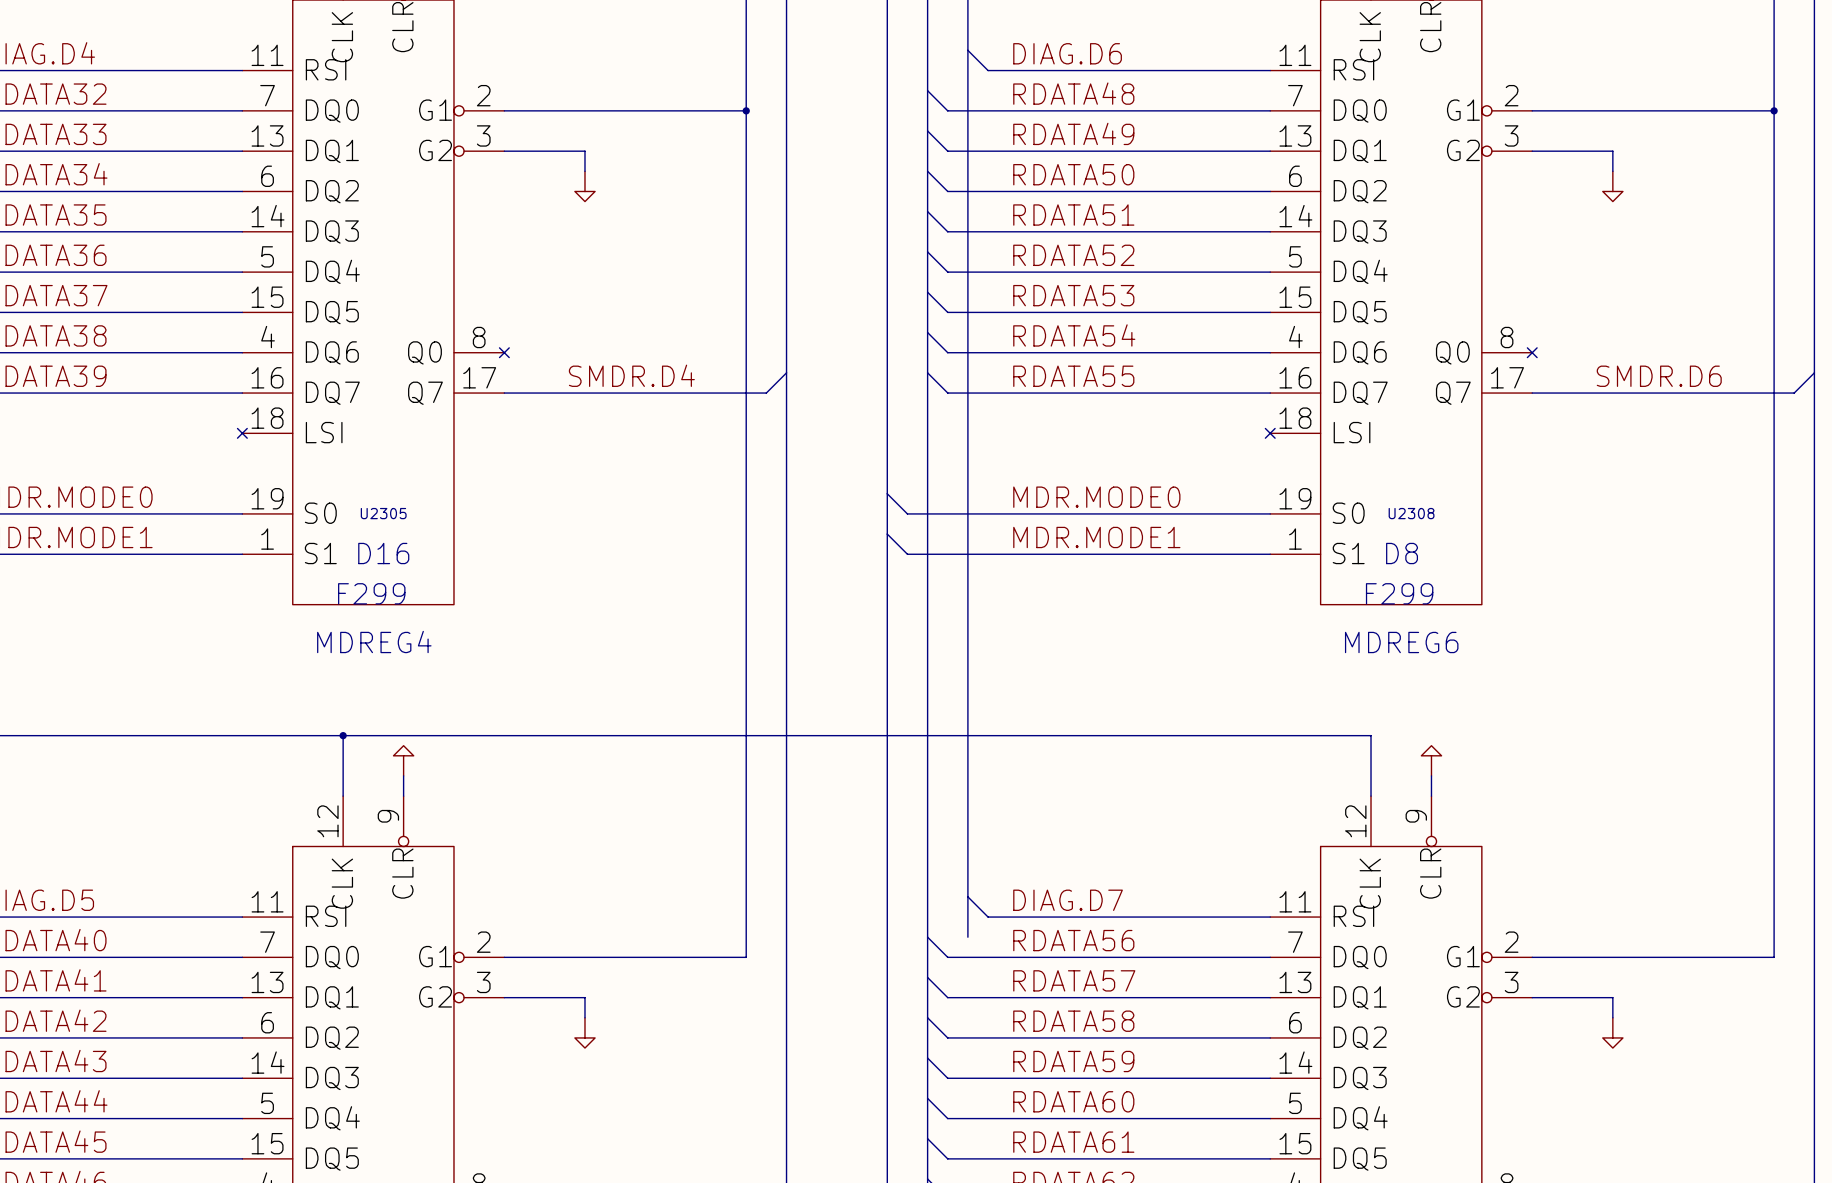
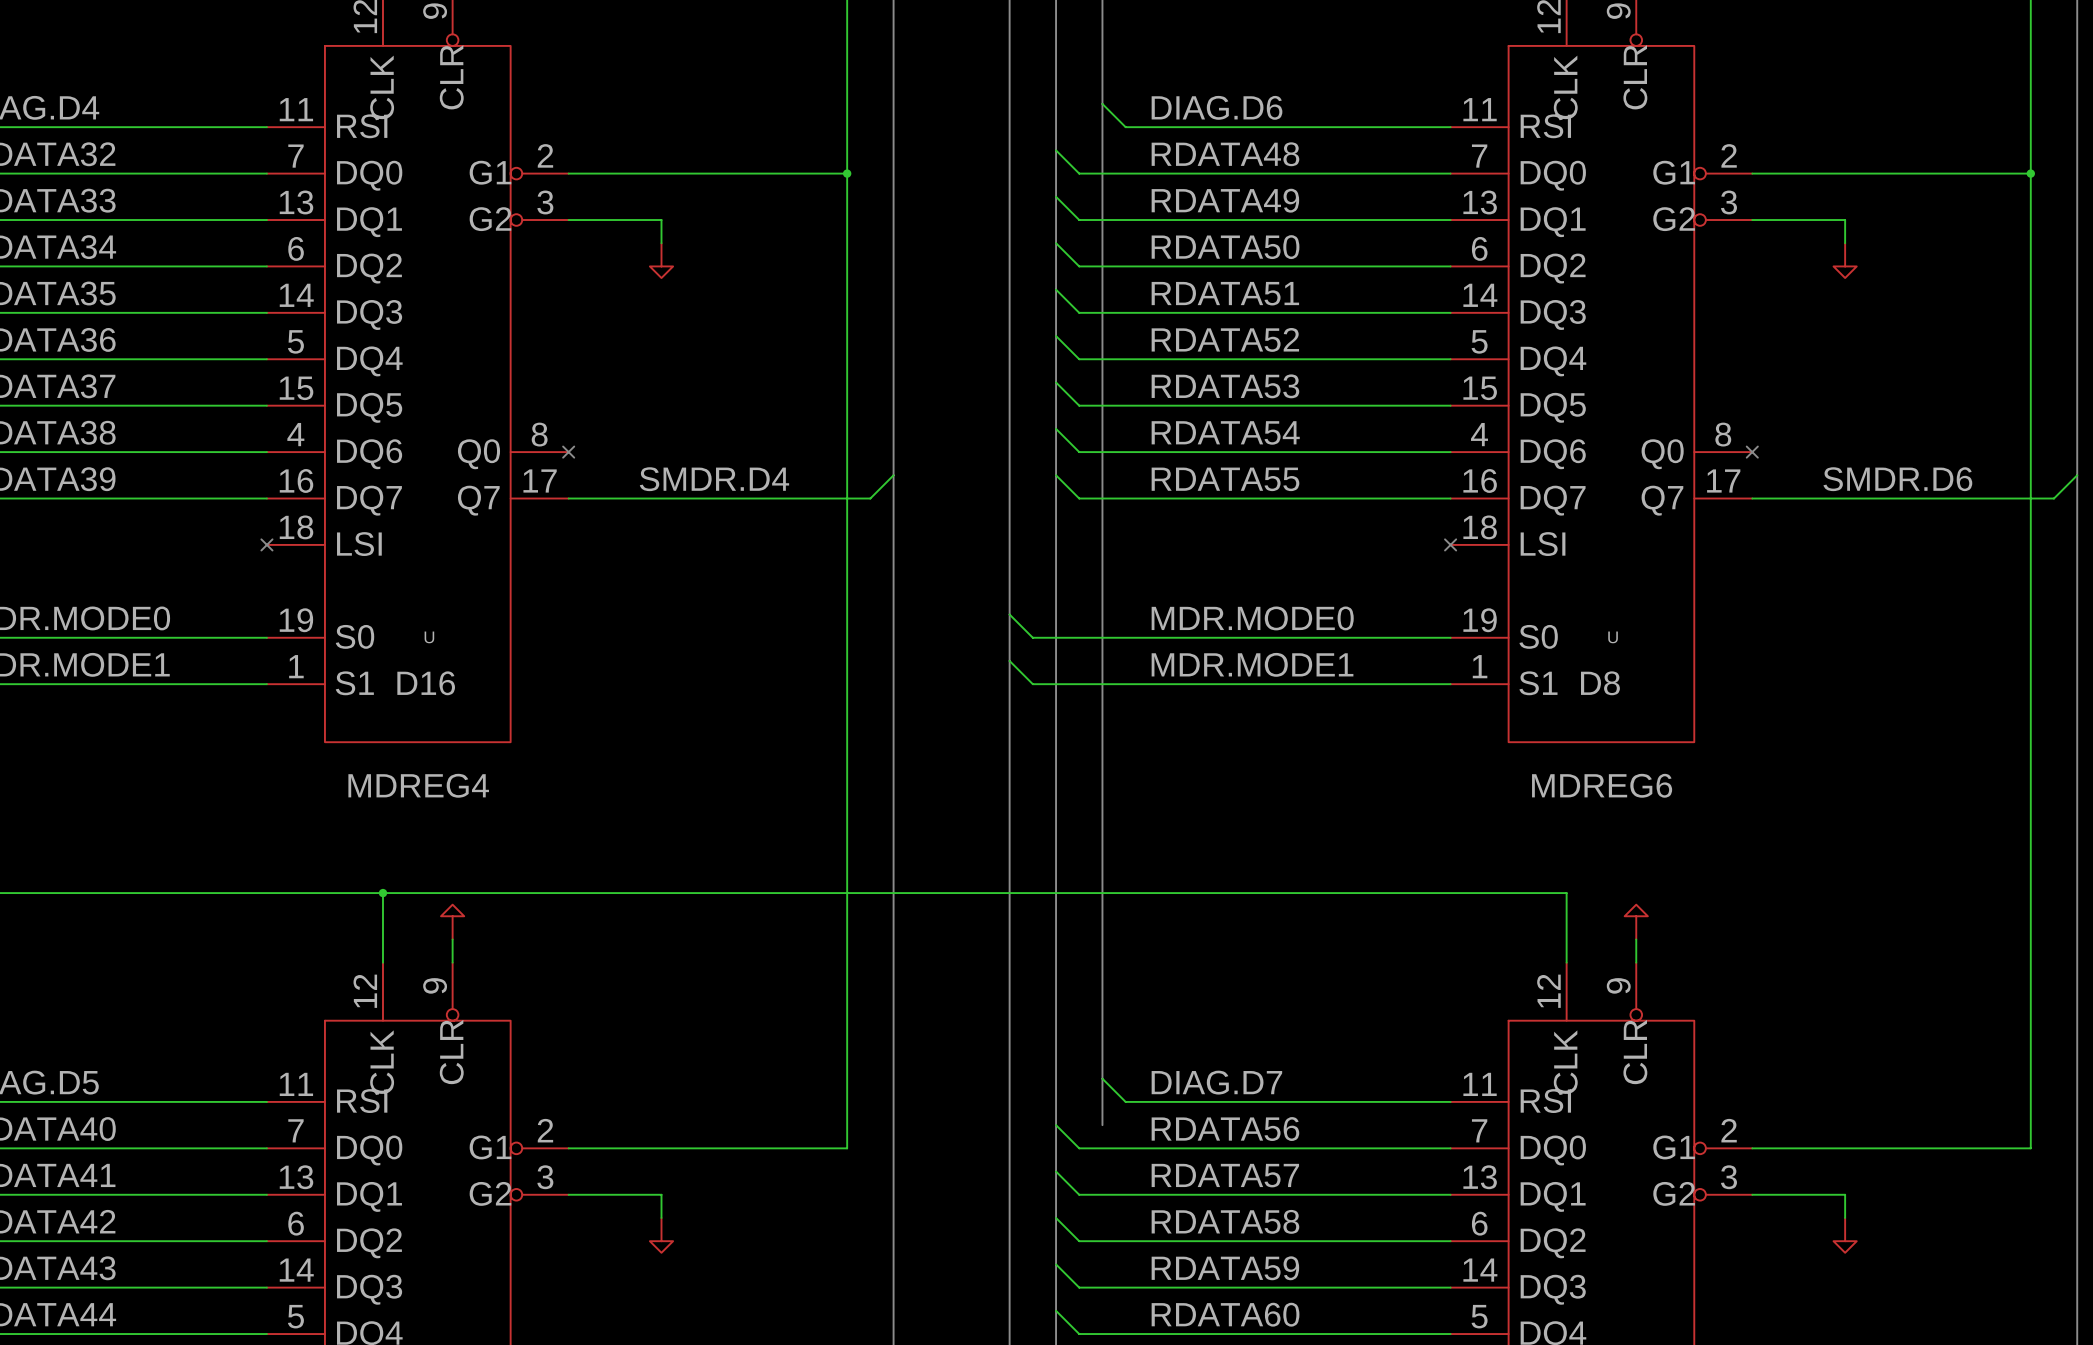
U2305 name: U2305 (383, 513) -> U (429, 637)
U2308 name: U2308 (1411, 513) -> U (1613, 637)
U2305 value: F299 (371, 593) -> none
U2308 value: F299 (1399, 593) -> none

